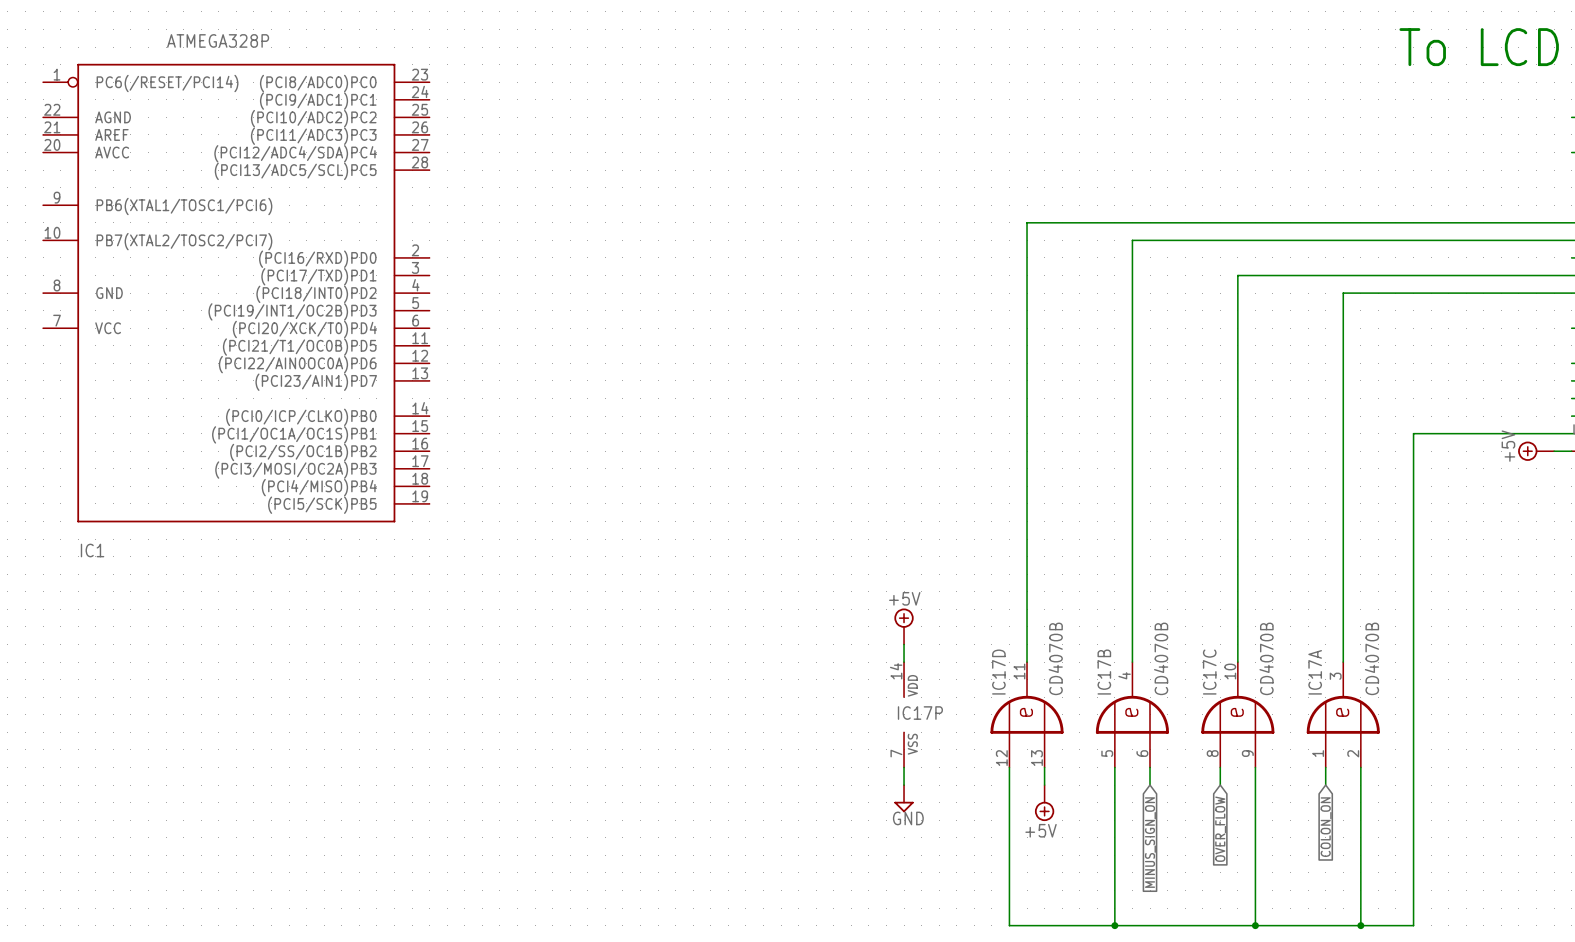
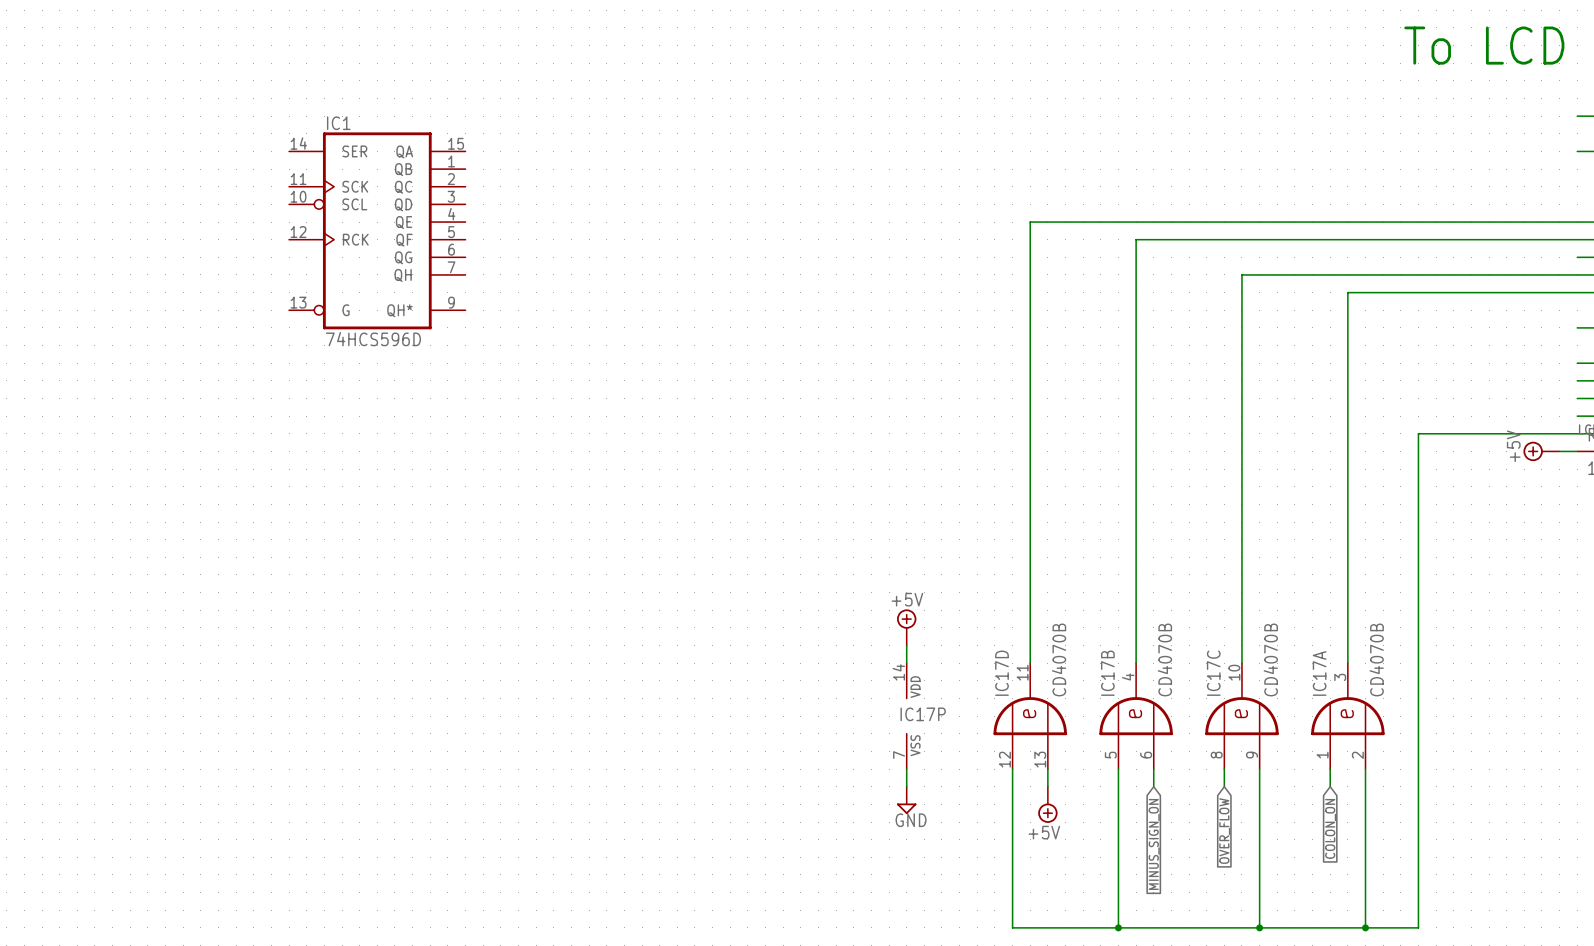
IC1 value: ATMEGA328P (218, 40) -> 74HCS596D (373, 339)
IC1 symbol: [43, 63, 430, 523] -> [289, 132, 466, 330]
IC1 name position: IC1 (92, 550) -> IC1 (338, 123)

